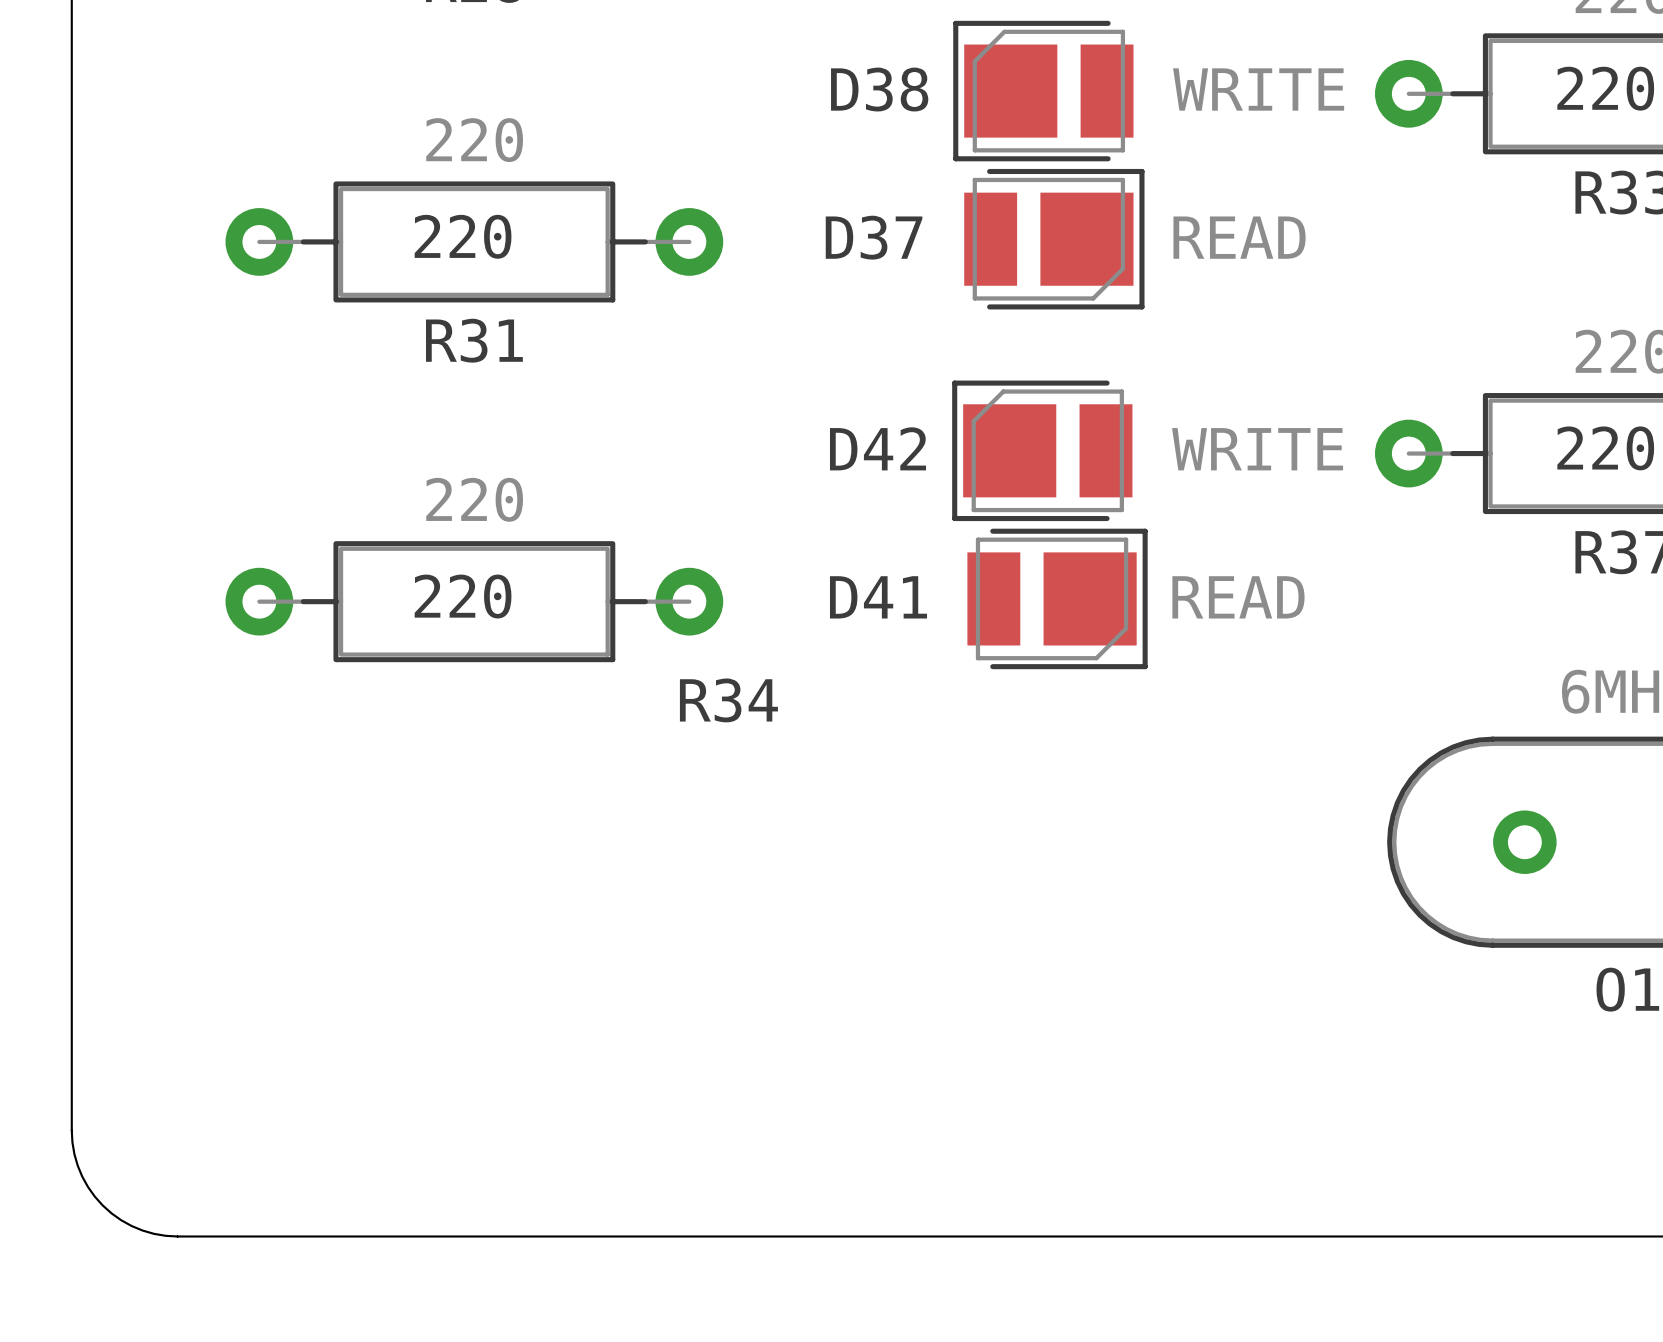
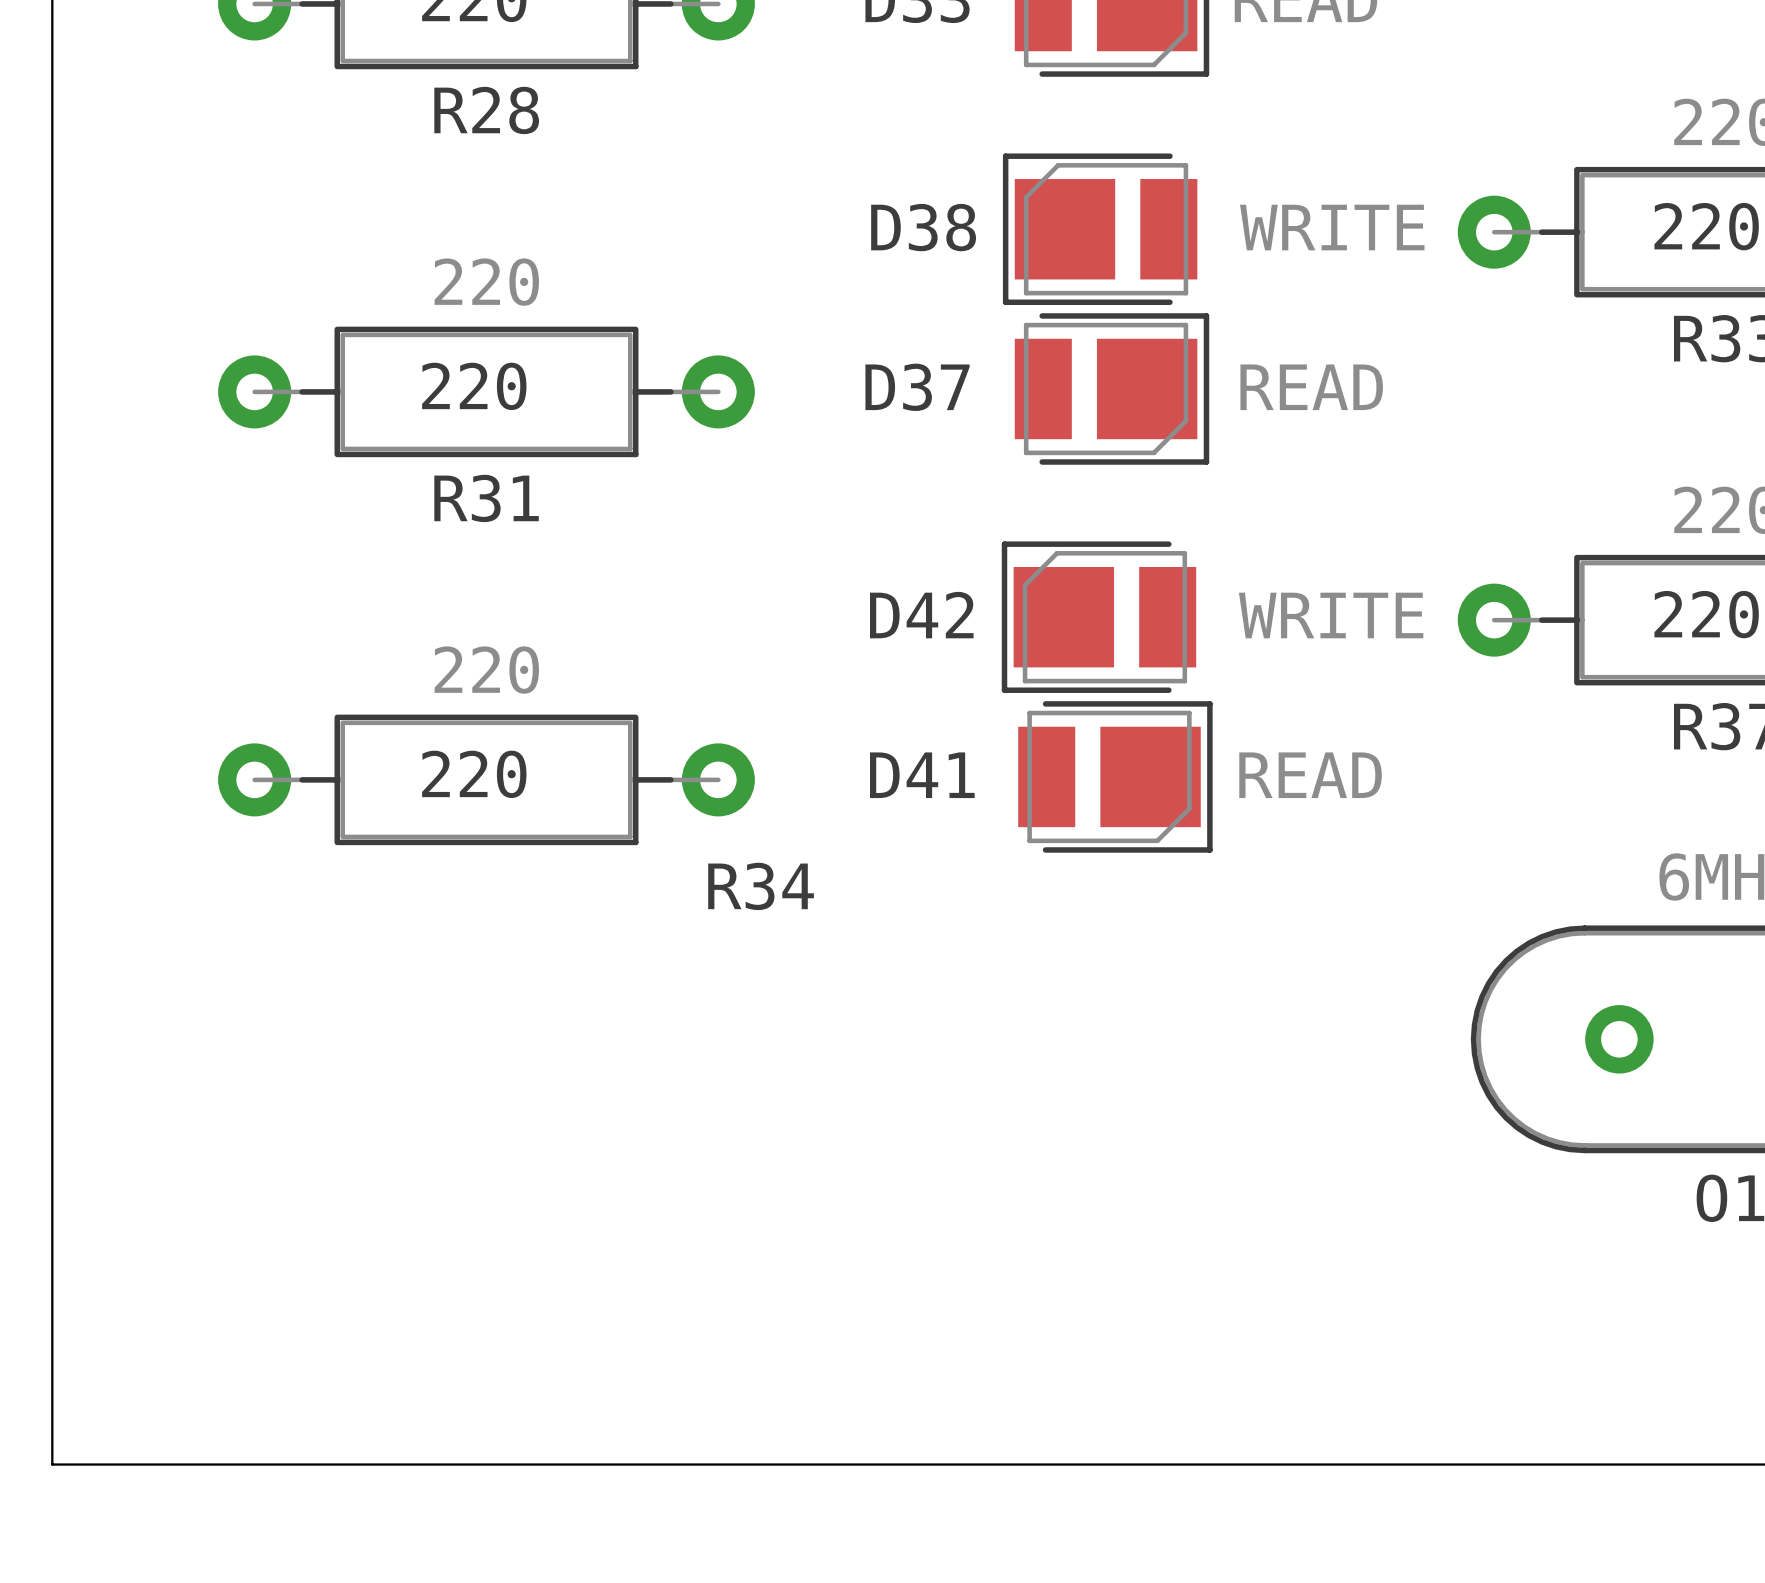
board edge: (71, 1130) (77, 1165) (88, 1186) (102, 1205) (121, 1220) (142, 1230) (177, 1236) -> (52, 1350) (52, 1464) (166, 1464)

